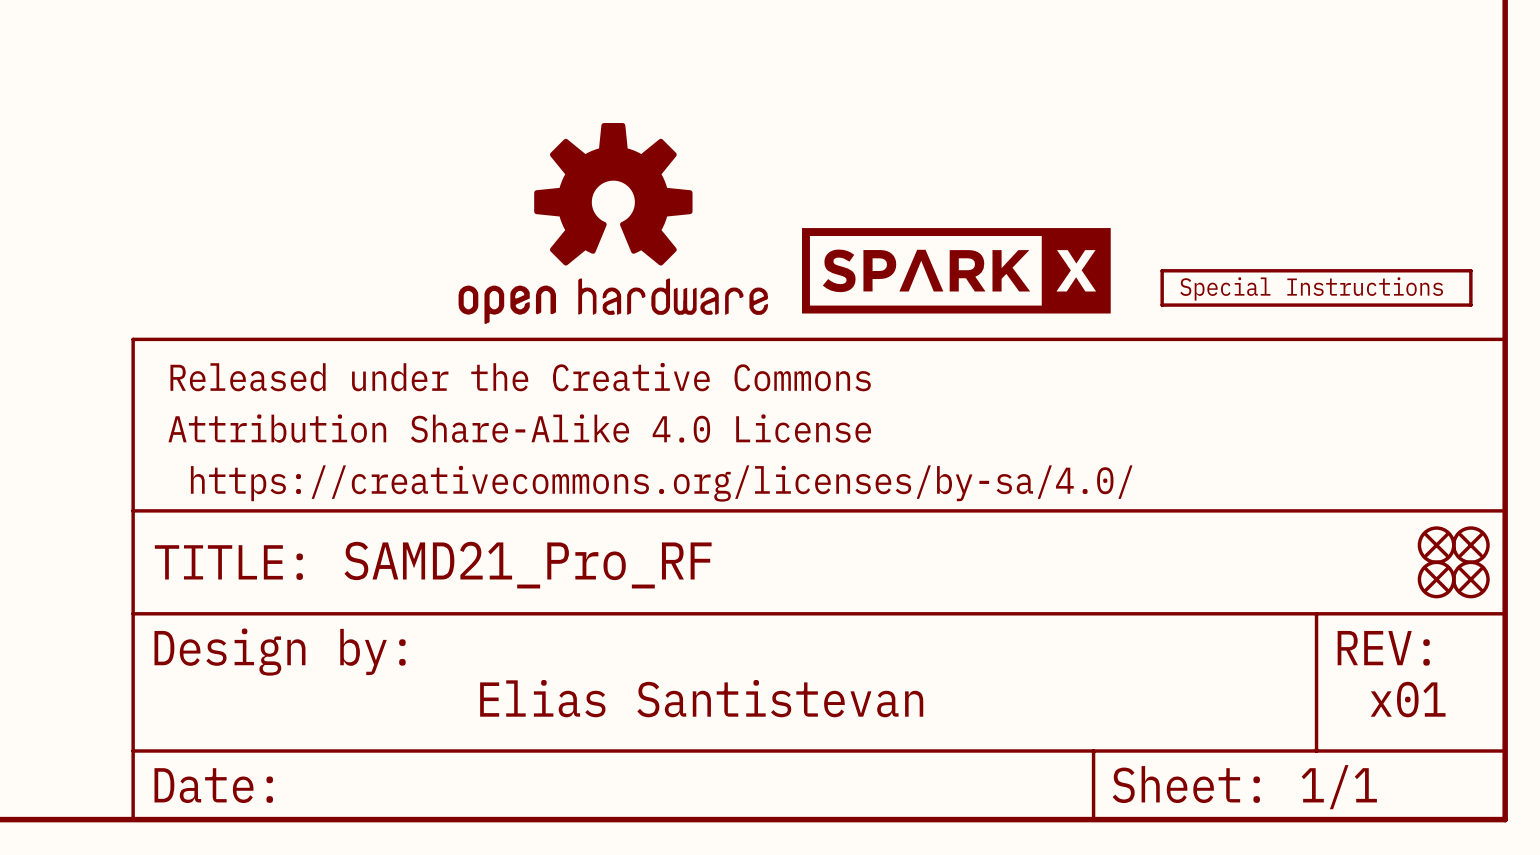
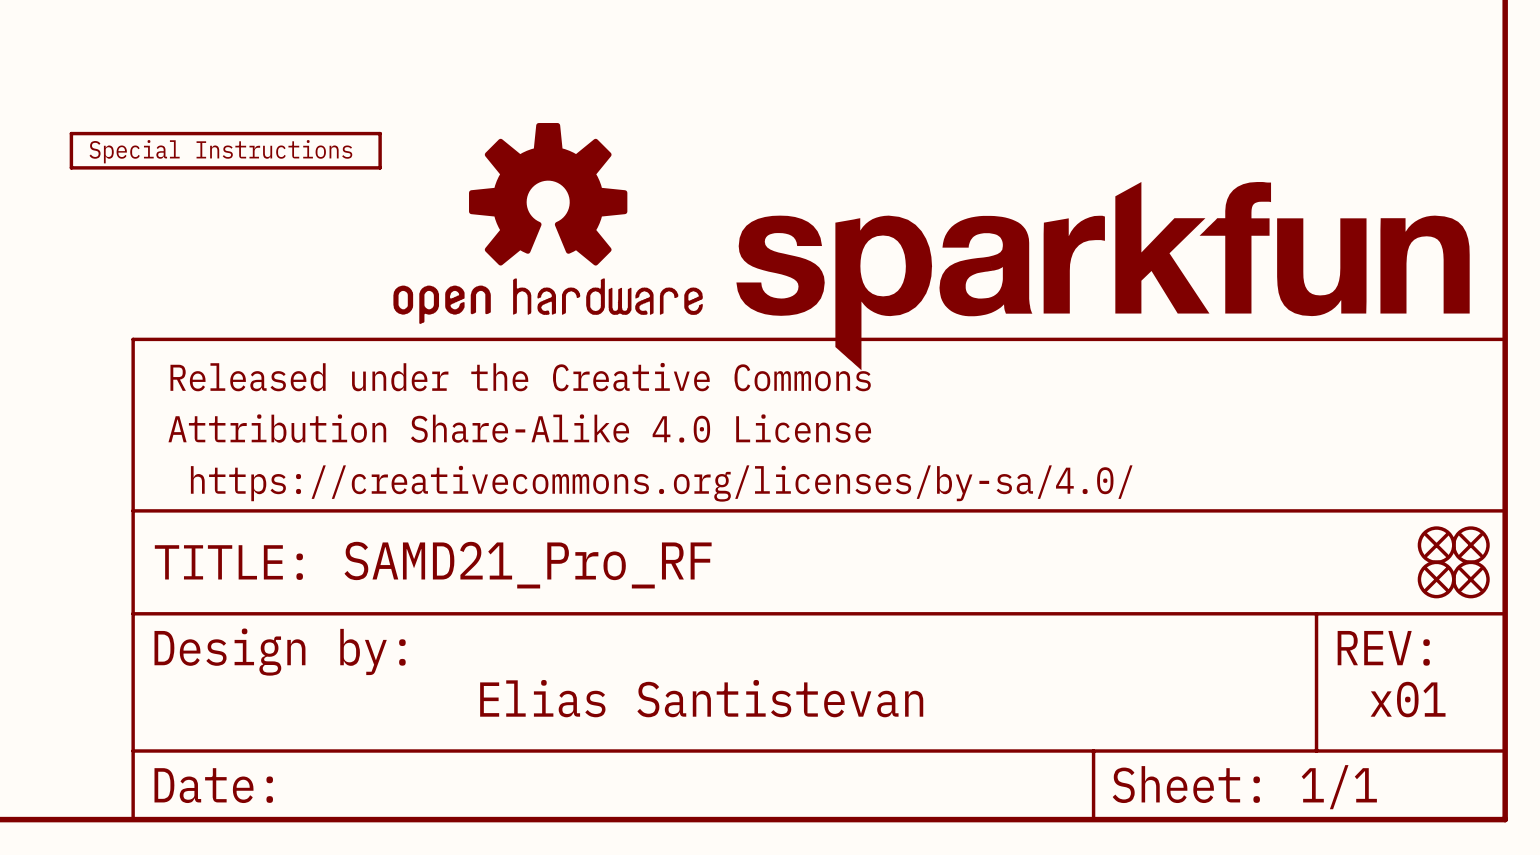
part: none -> (225, 150)
part position: (613, 223) -> (548, 223)
part: (956, 270) -> none
part: none -> (1103, 276)
part: (1316, 287) -> none

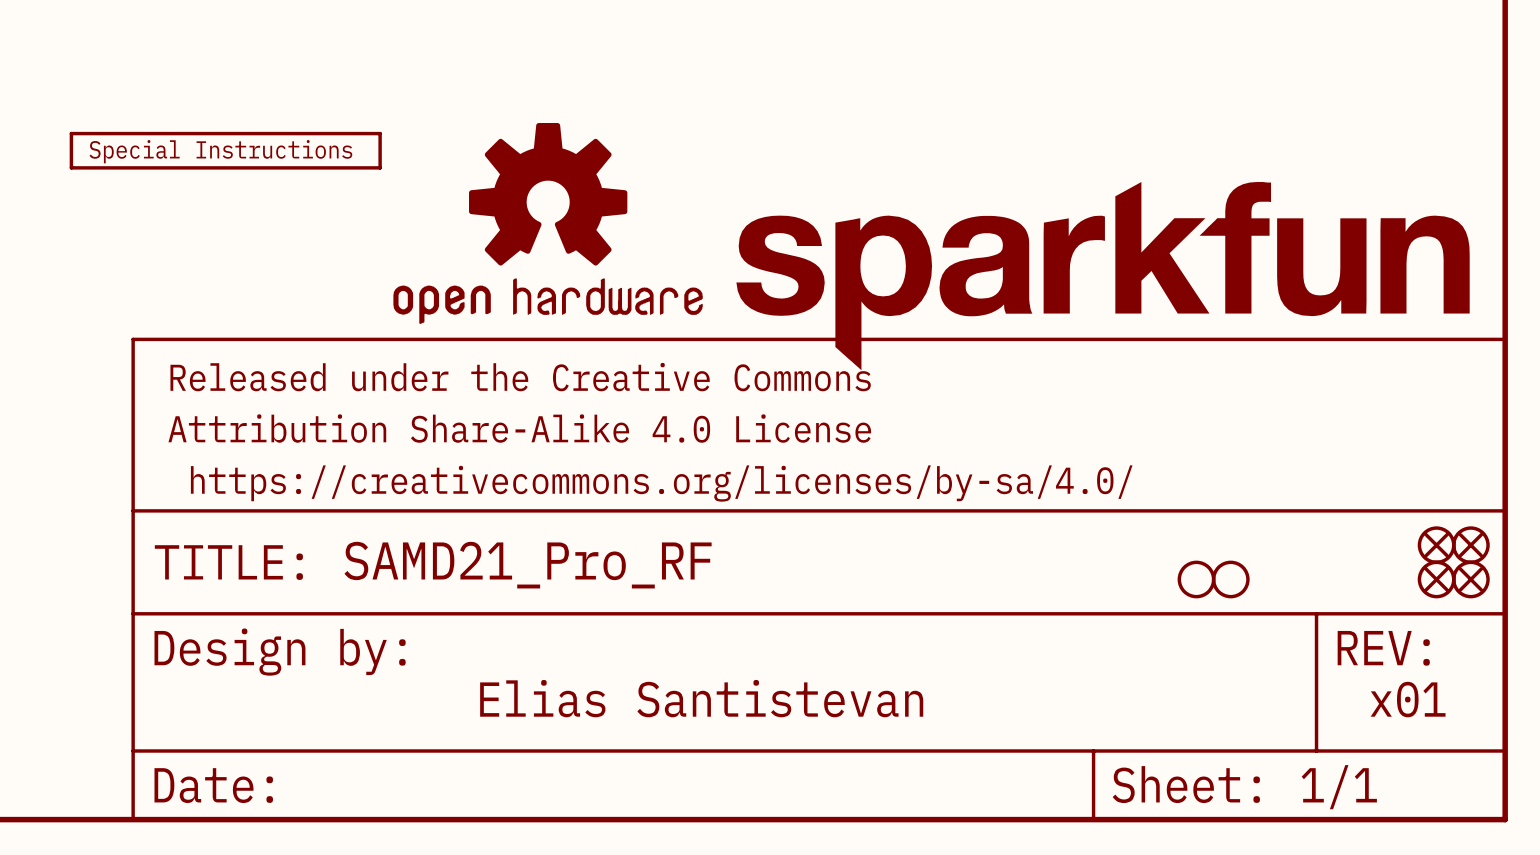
part: none -> (1196, 579)
part: none -> (1230, 579)

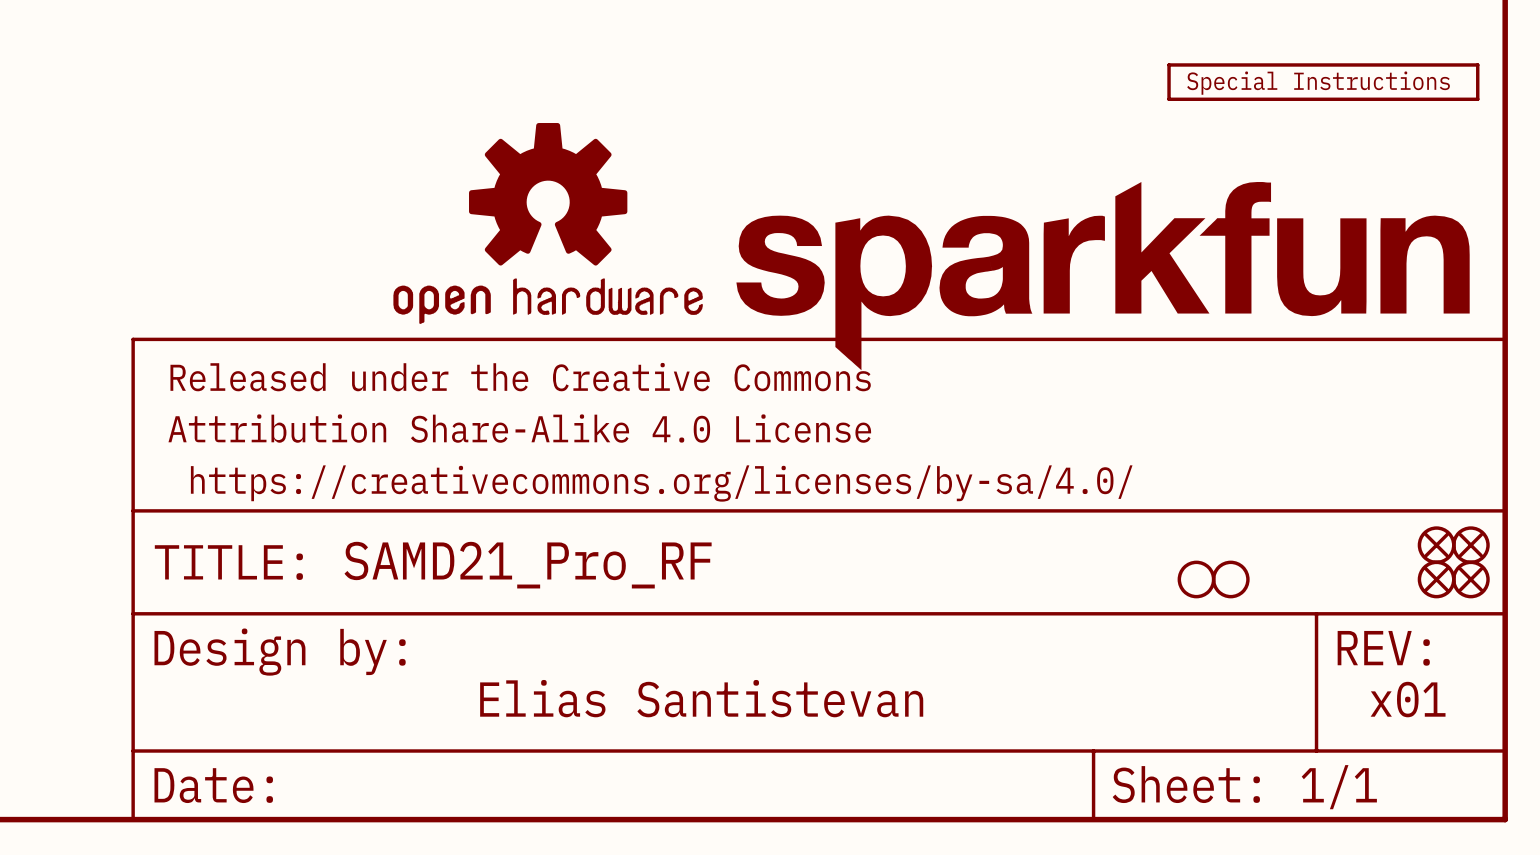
part: none -> (1323, 82)
part: (225, 150) -> none

